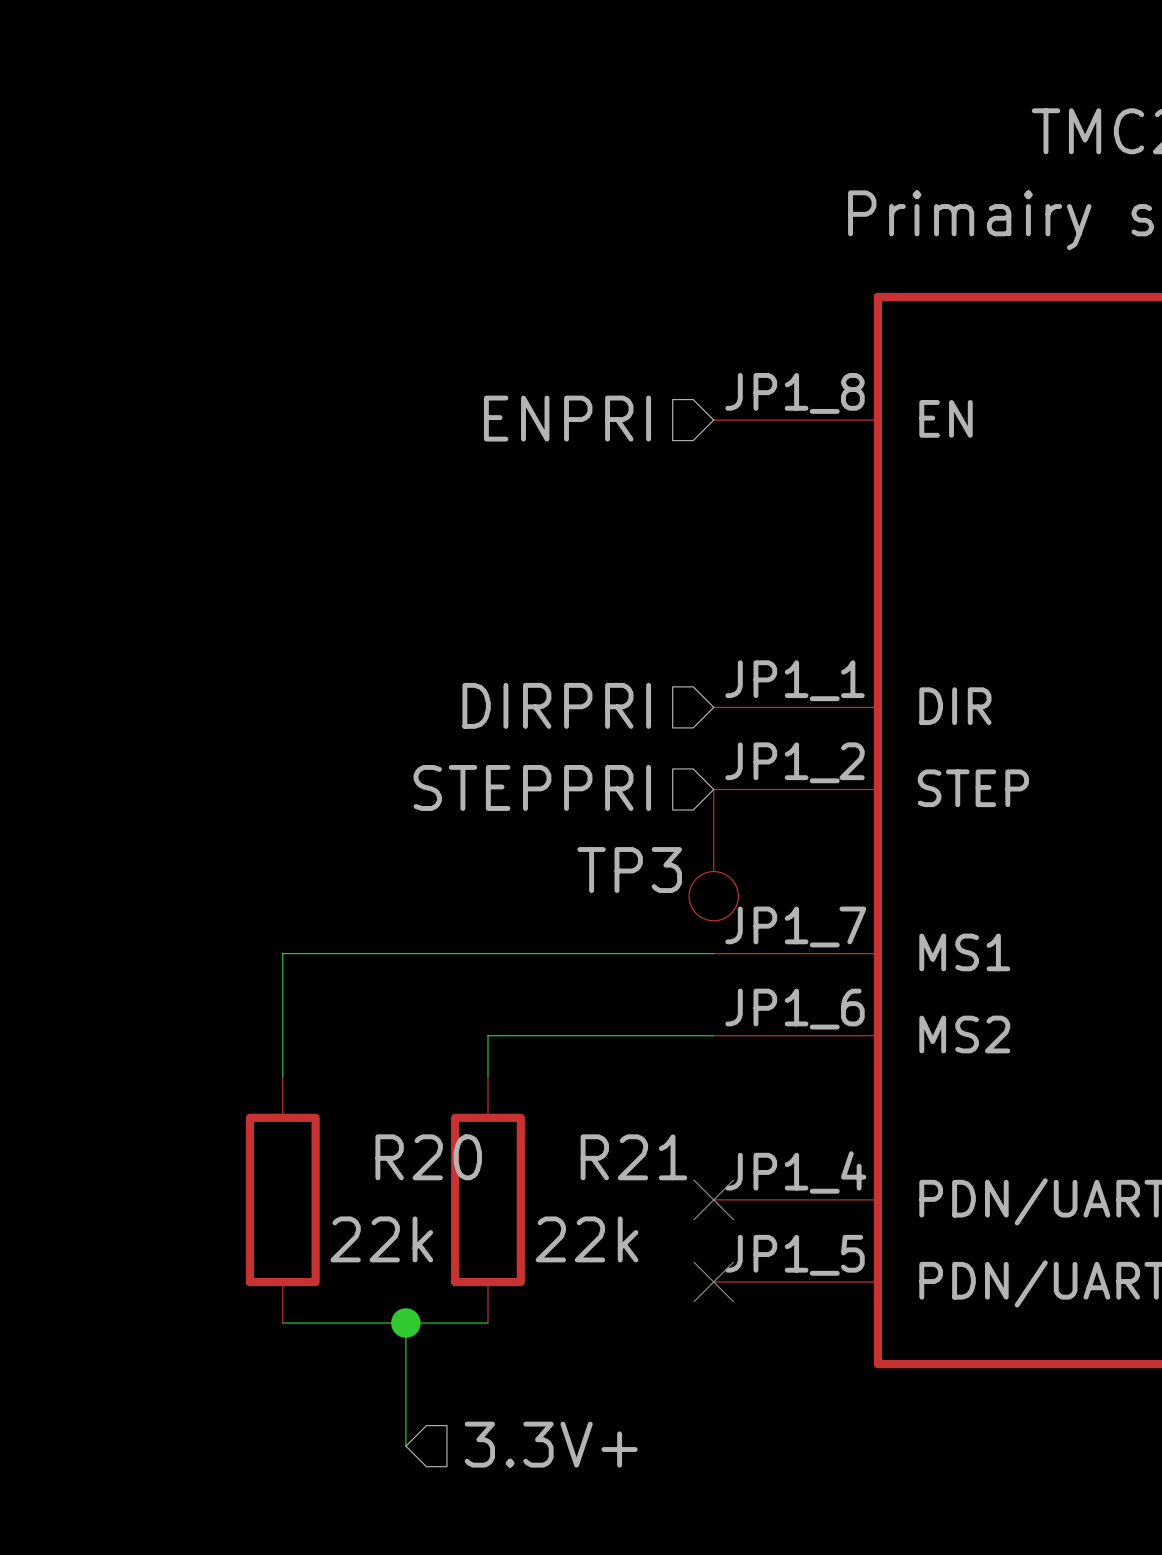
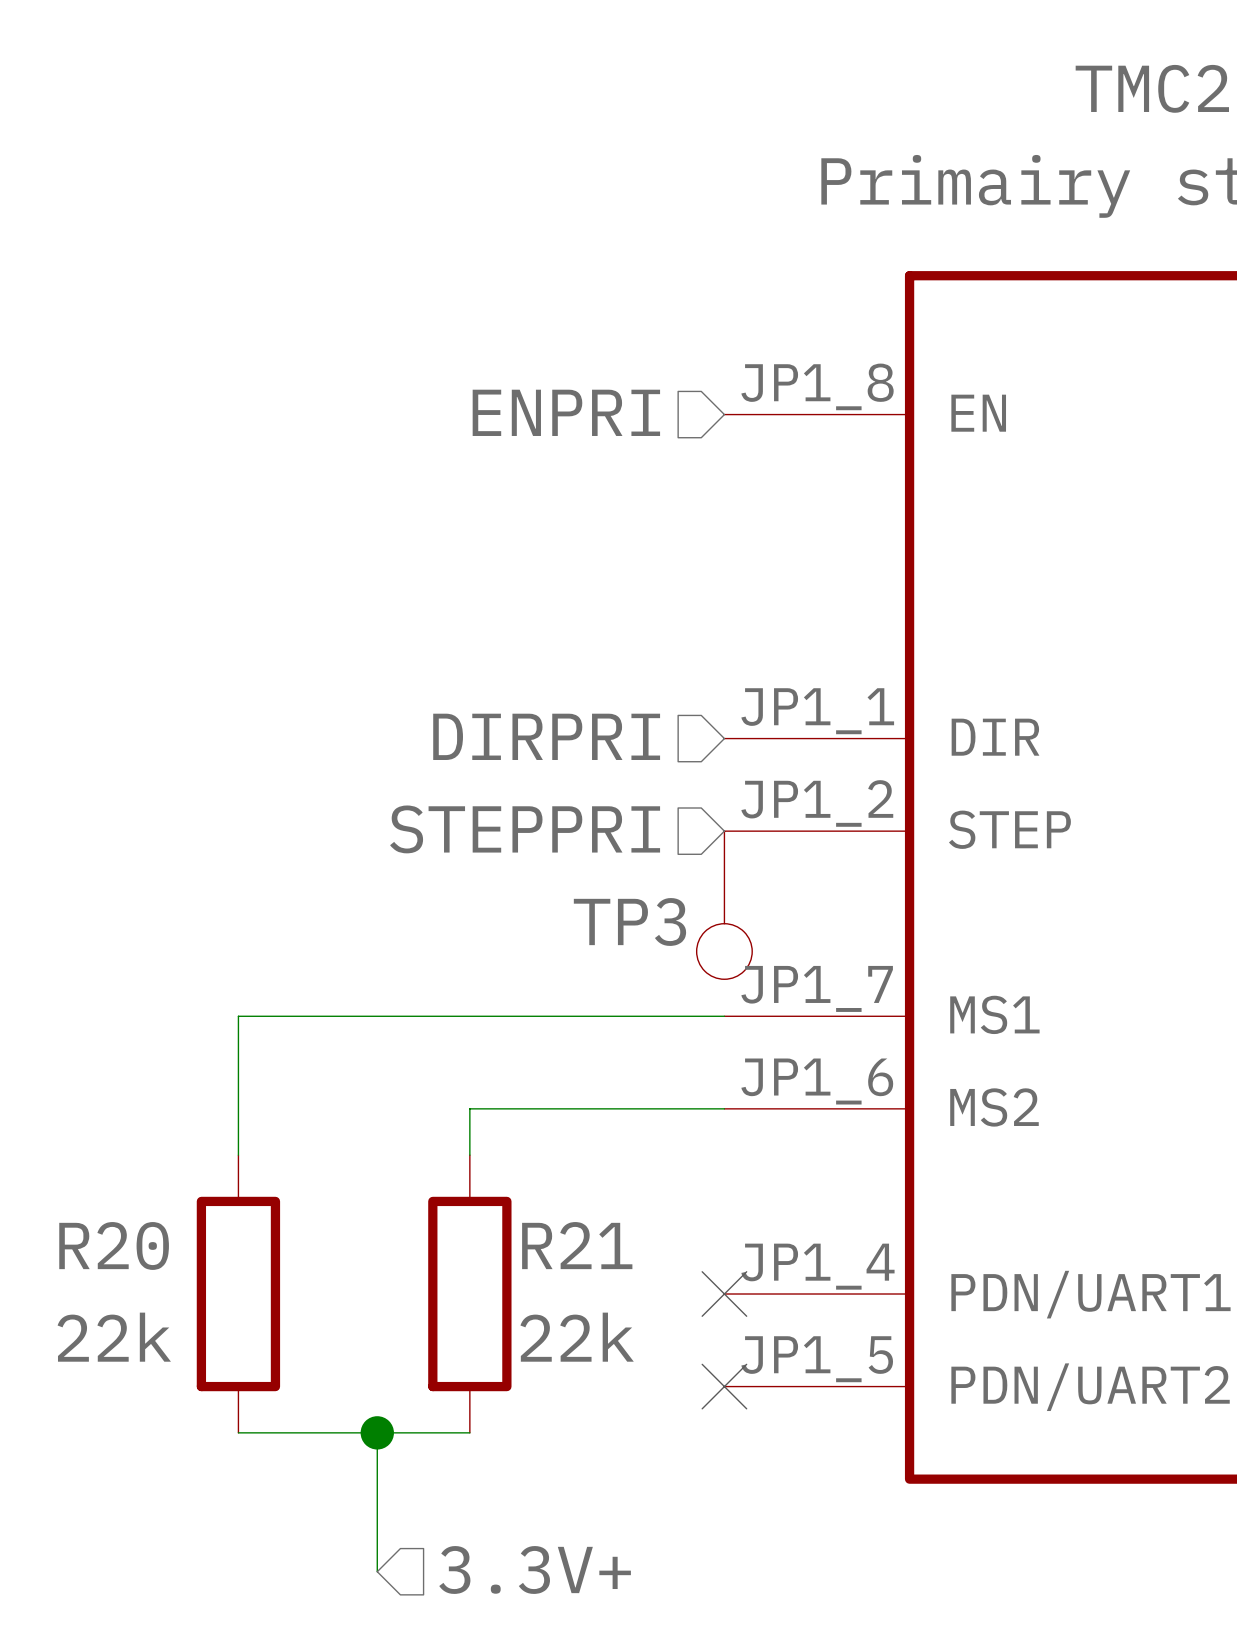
R20 name position: R20 (428, 1157) -> R20 (114, 1245)
R21 name position: R21 (633, 1157) -> R21 (577, 1245)
R20 value position: 22k (381, 1239) -> 22k (114, 1337)

